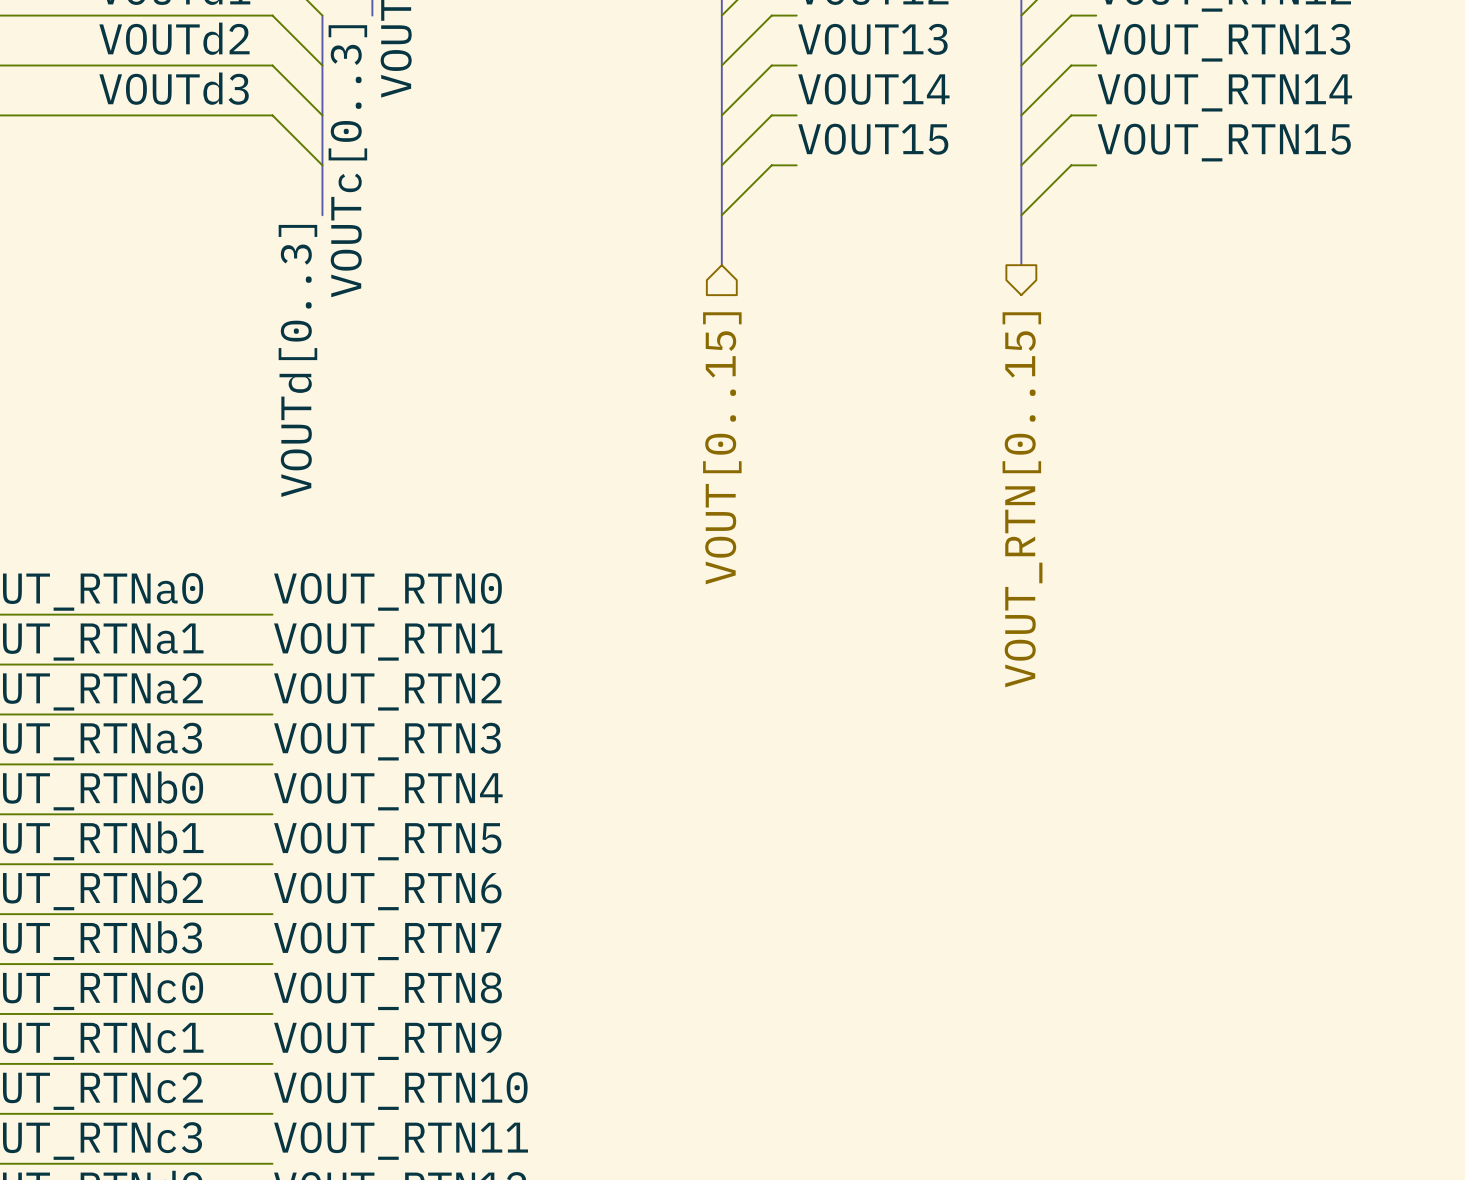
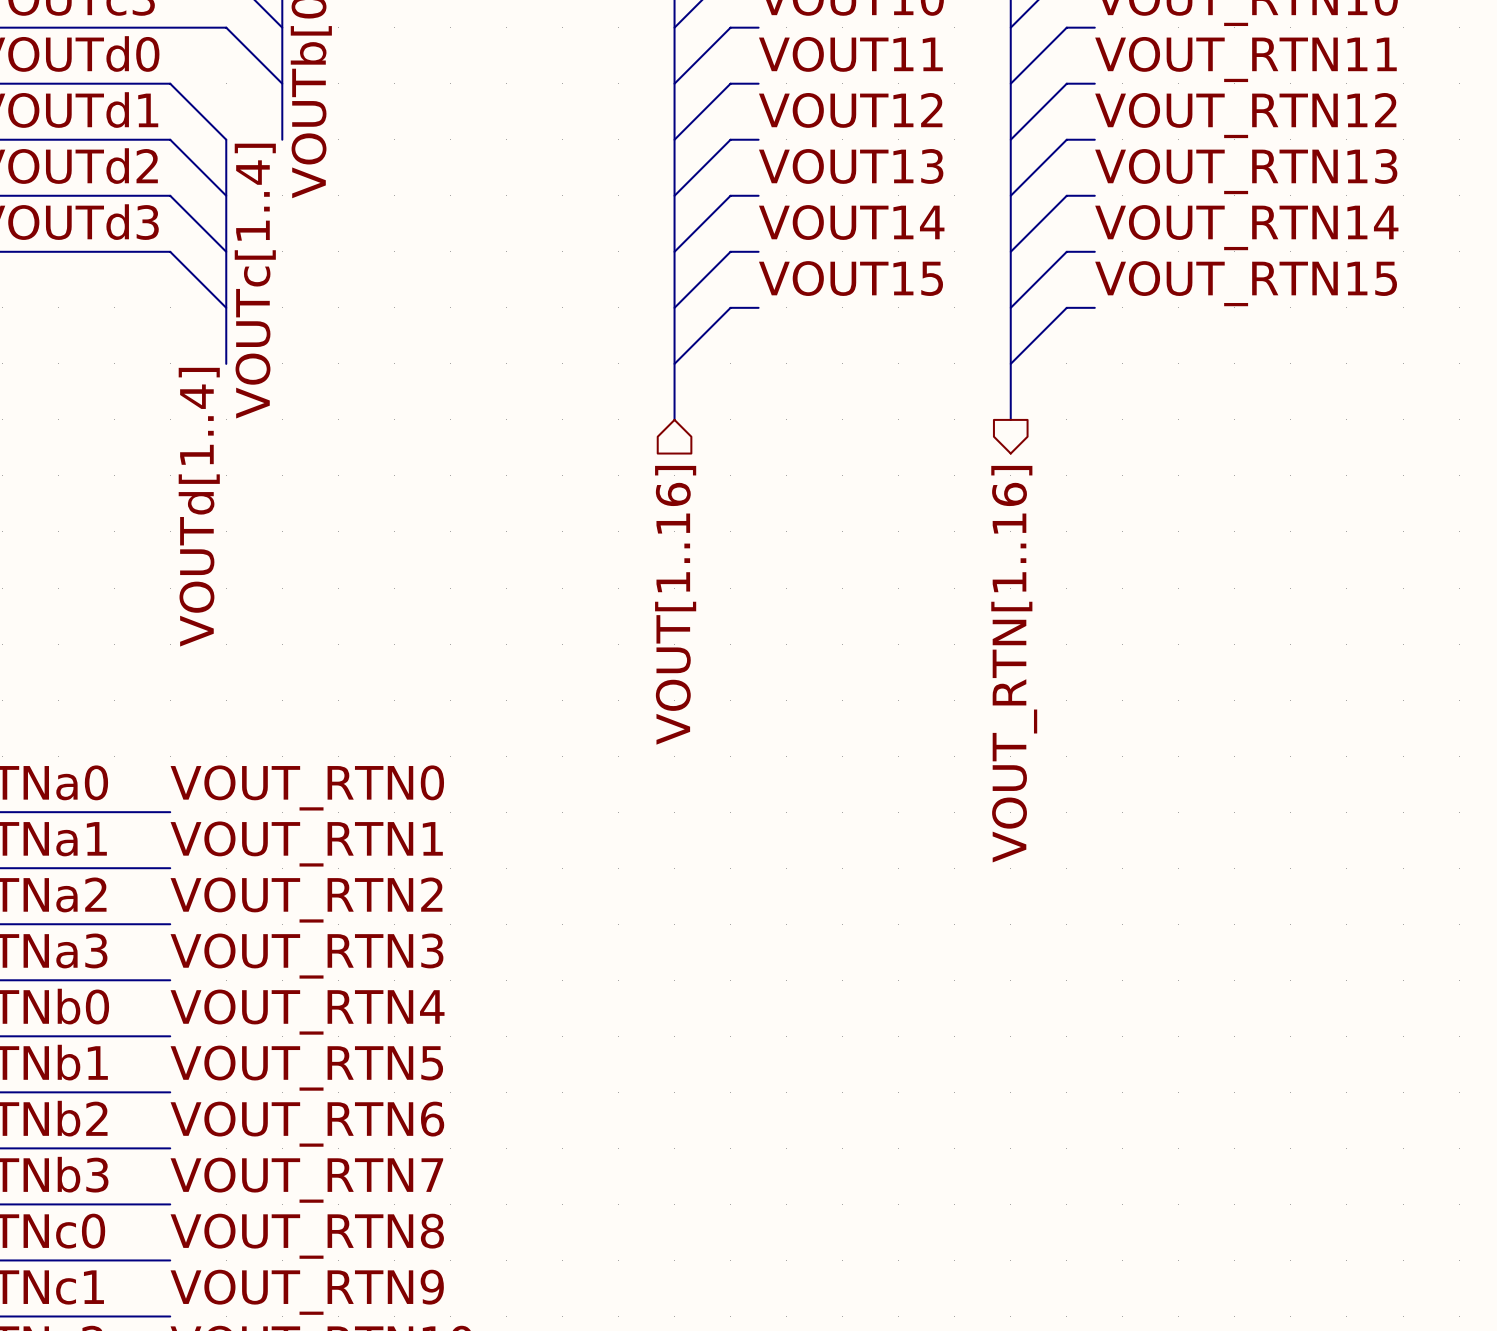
label: VOUTc[0..3] (347, 161) -> VOUTc[1..4] (255, 281)
label: VOUTd[0..3] (297, 360) -> VOUTd[1..4] (199, 507)
hierarchical label: VOUT[0..15] (722, 448) -> VOUT[1..16] (675, 605)
hierarchical label: VOUT_RTN[0..15] (1022, 499) -> VOUT_RTN[1..16] (1014, 664)

